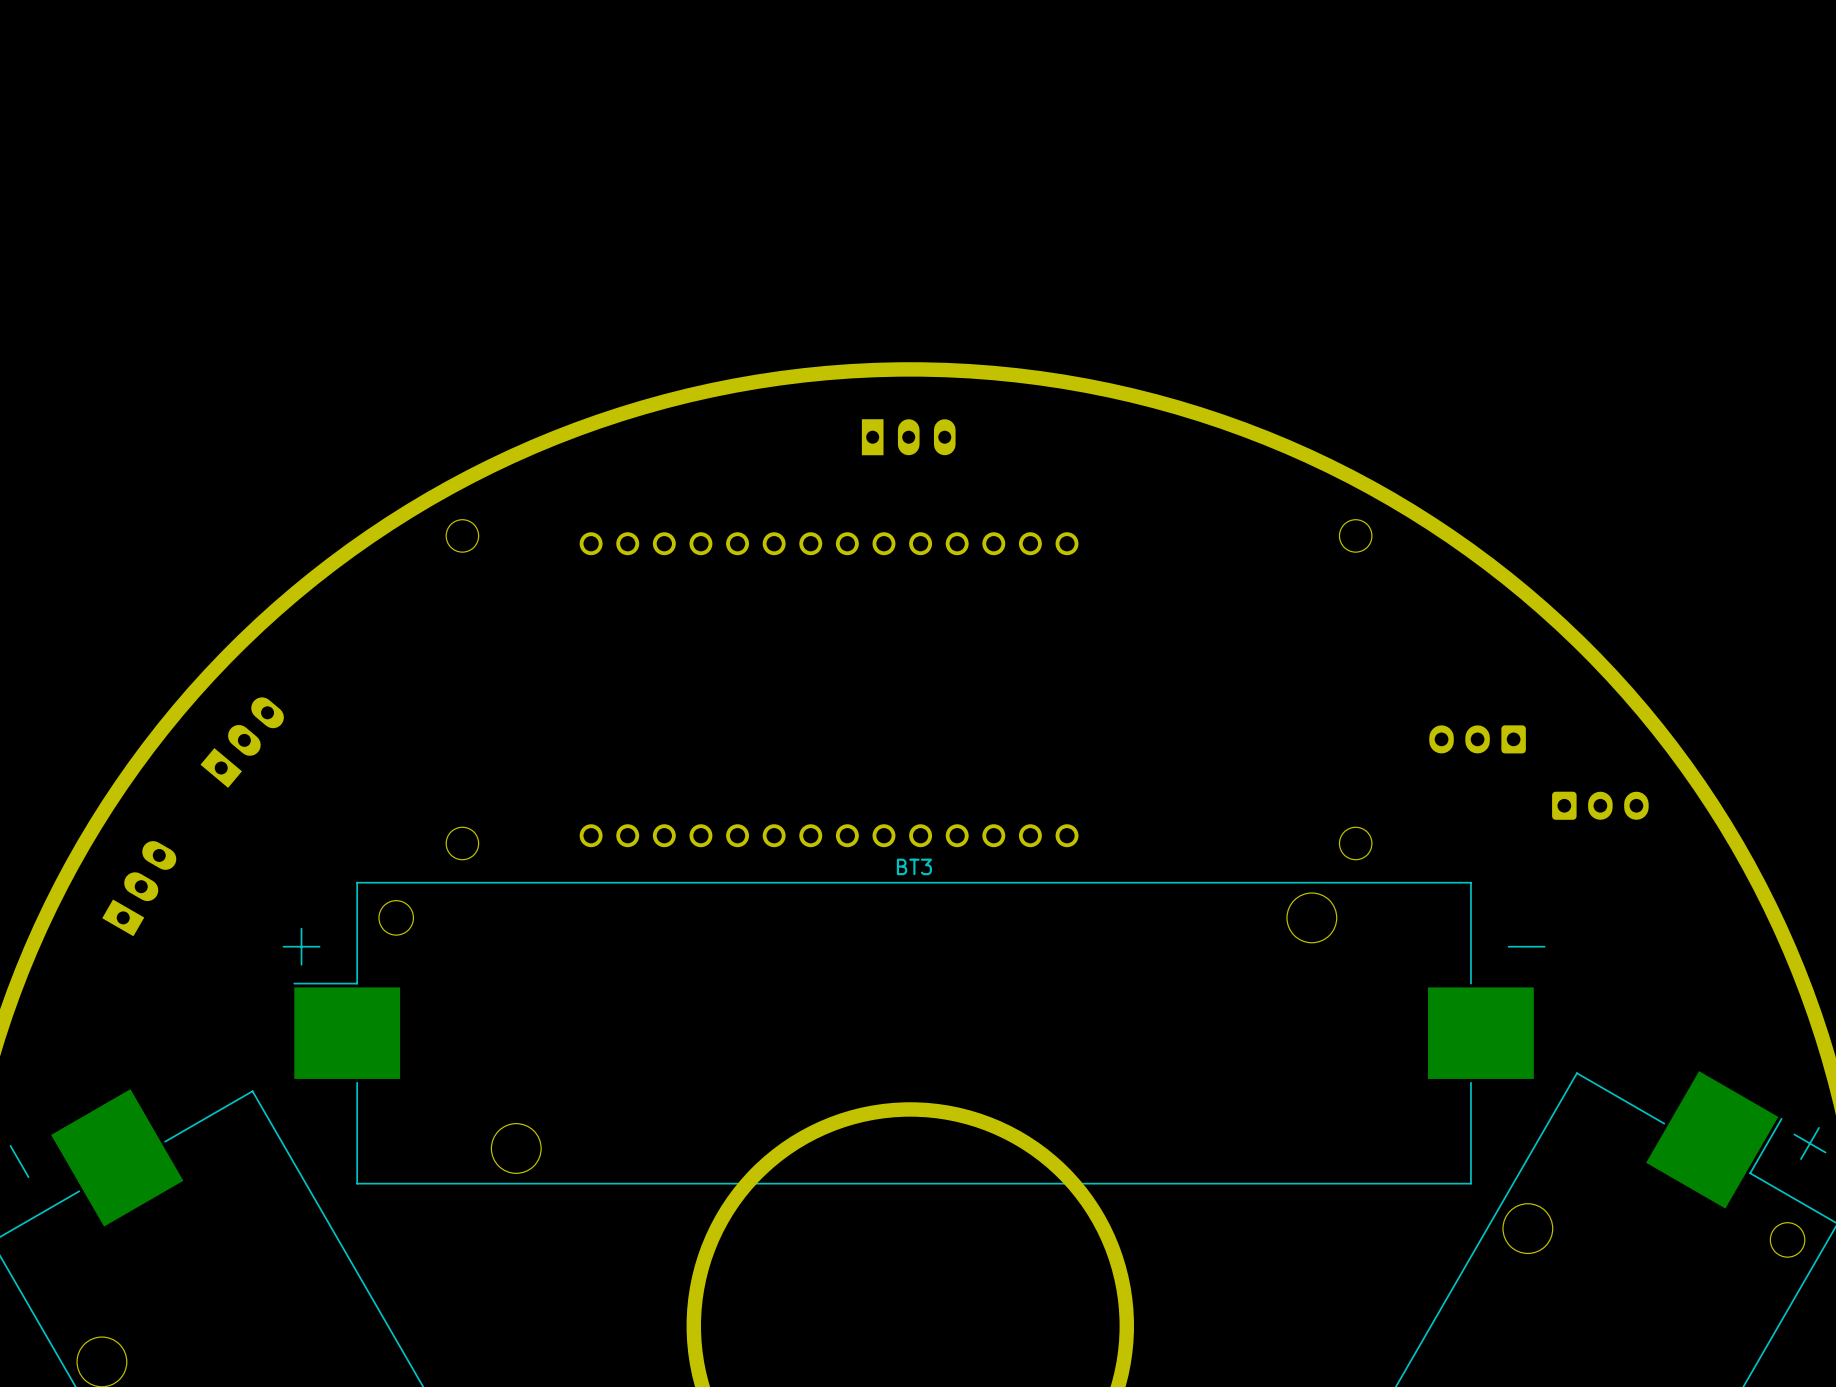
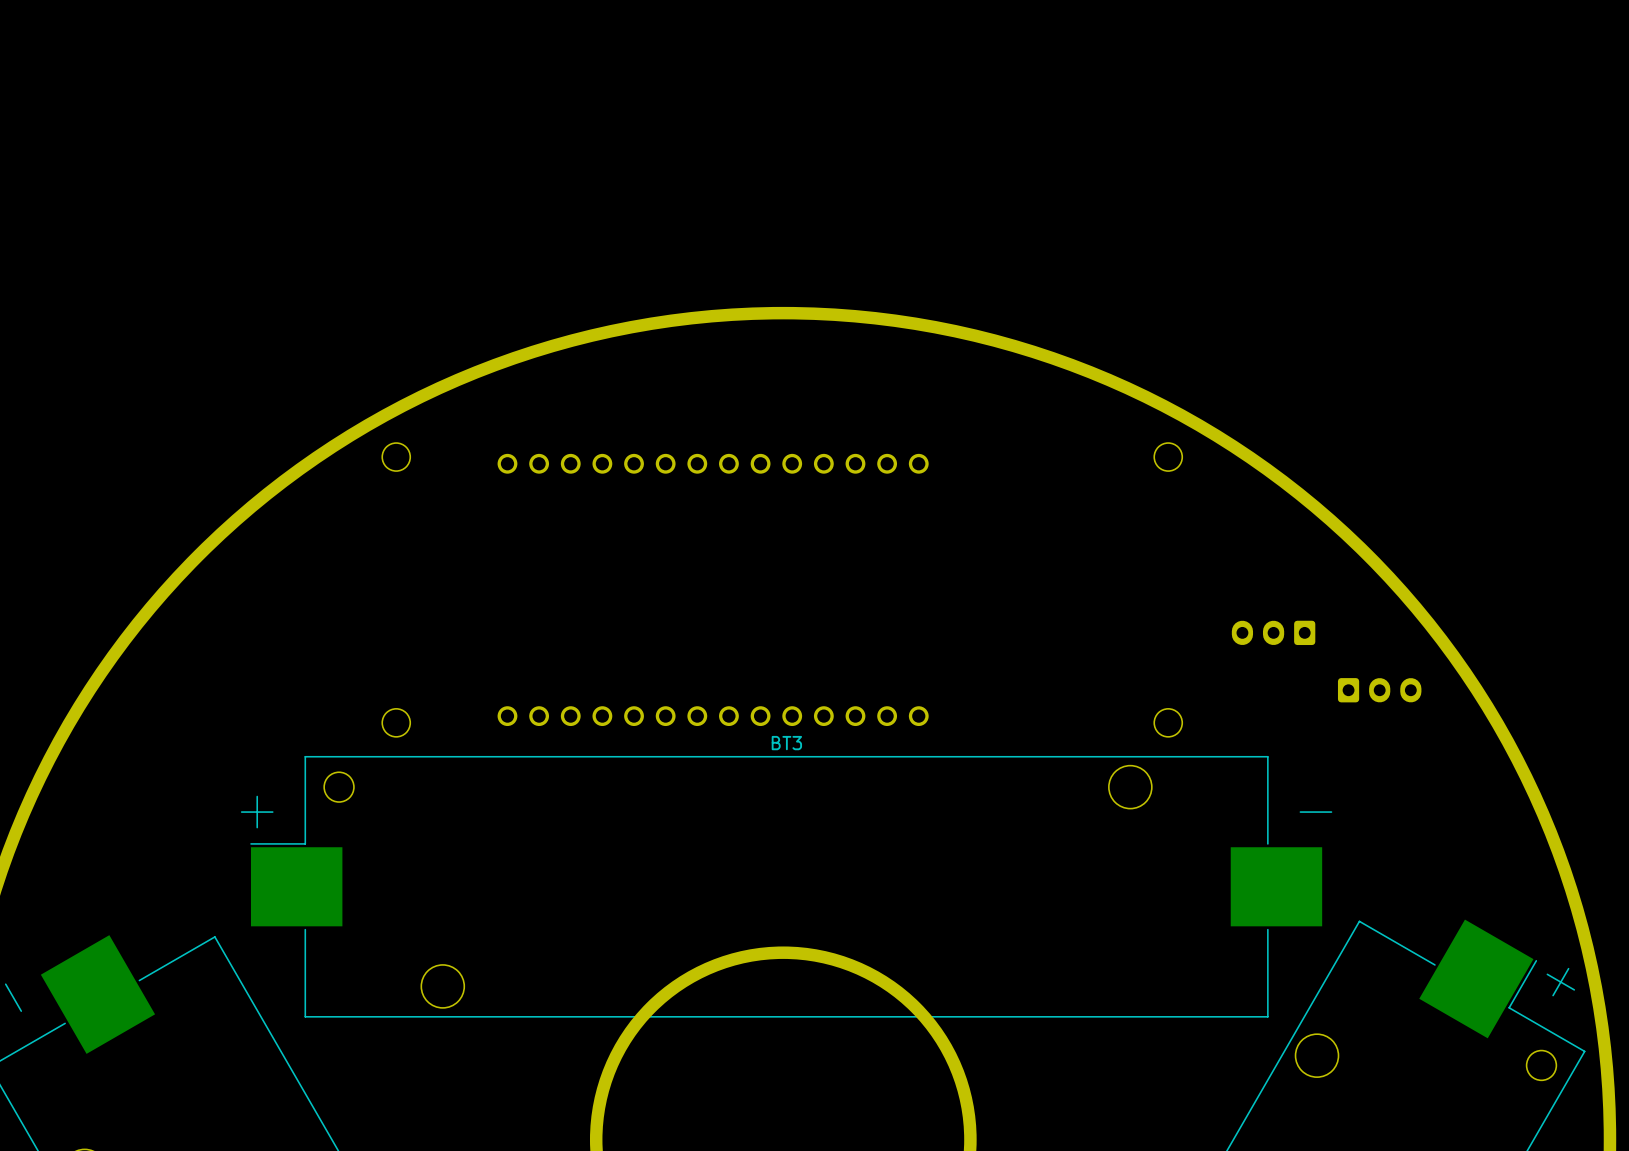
part: (908, 437) -> none
part: (242, 742) -> none
part: (139, 888) -> none

